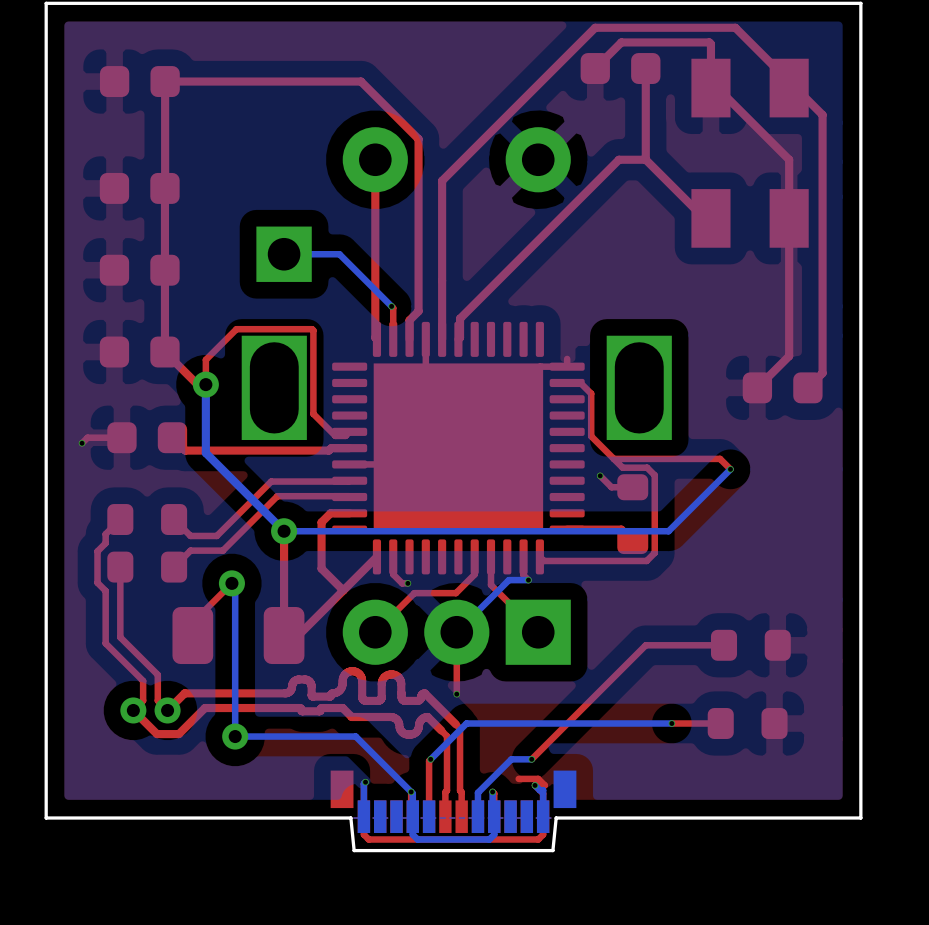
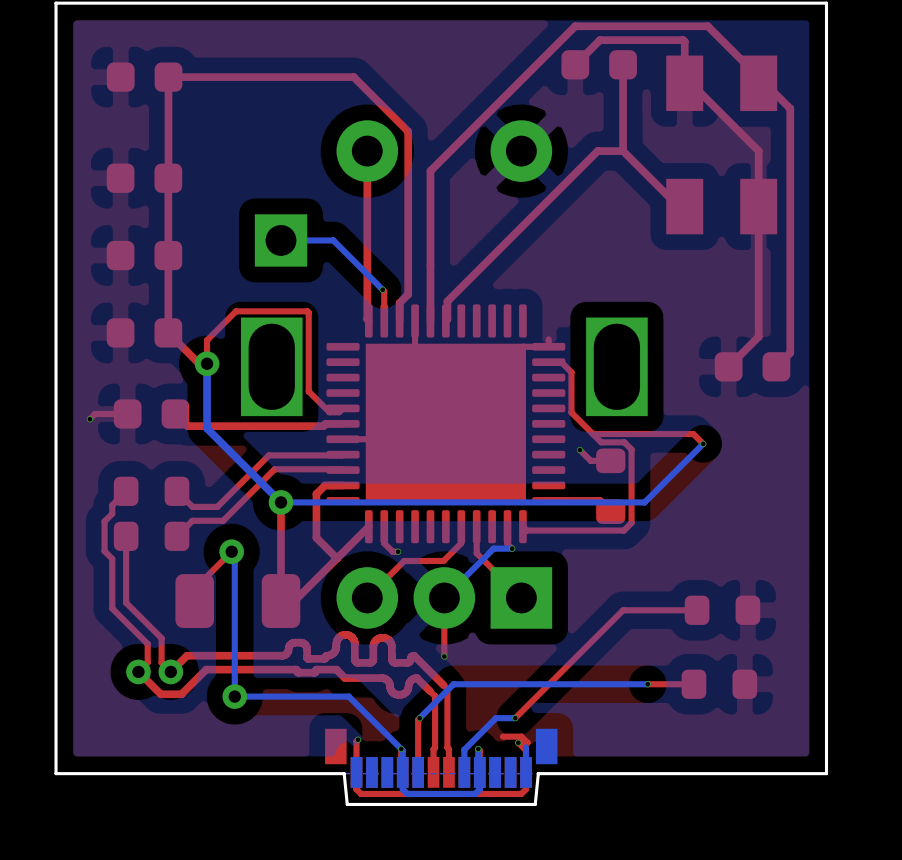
bottom track: (365, 782) (363, 783) (363, 816) -> none
bottom track: (534, 785) (539, 790) (543, 790) -> none

